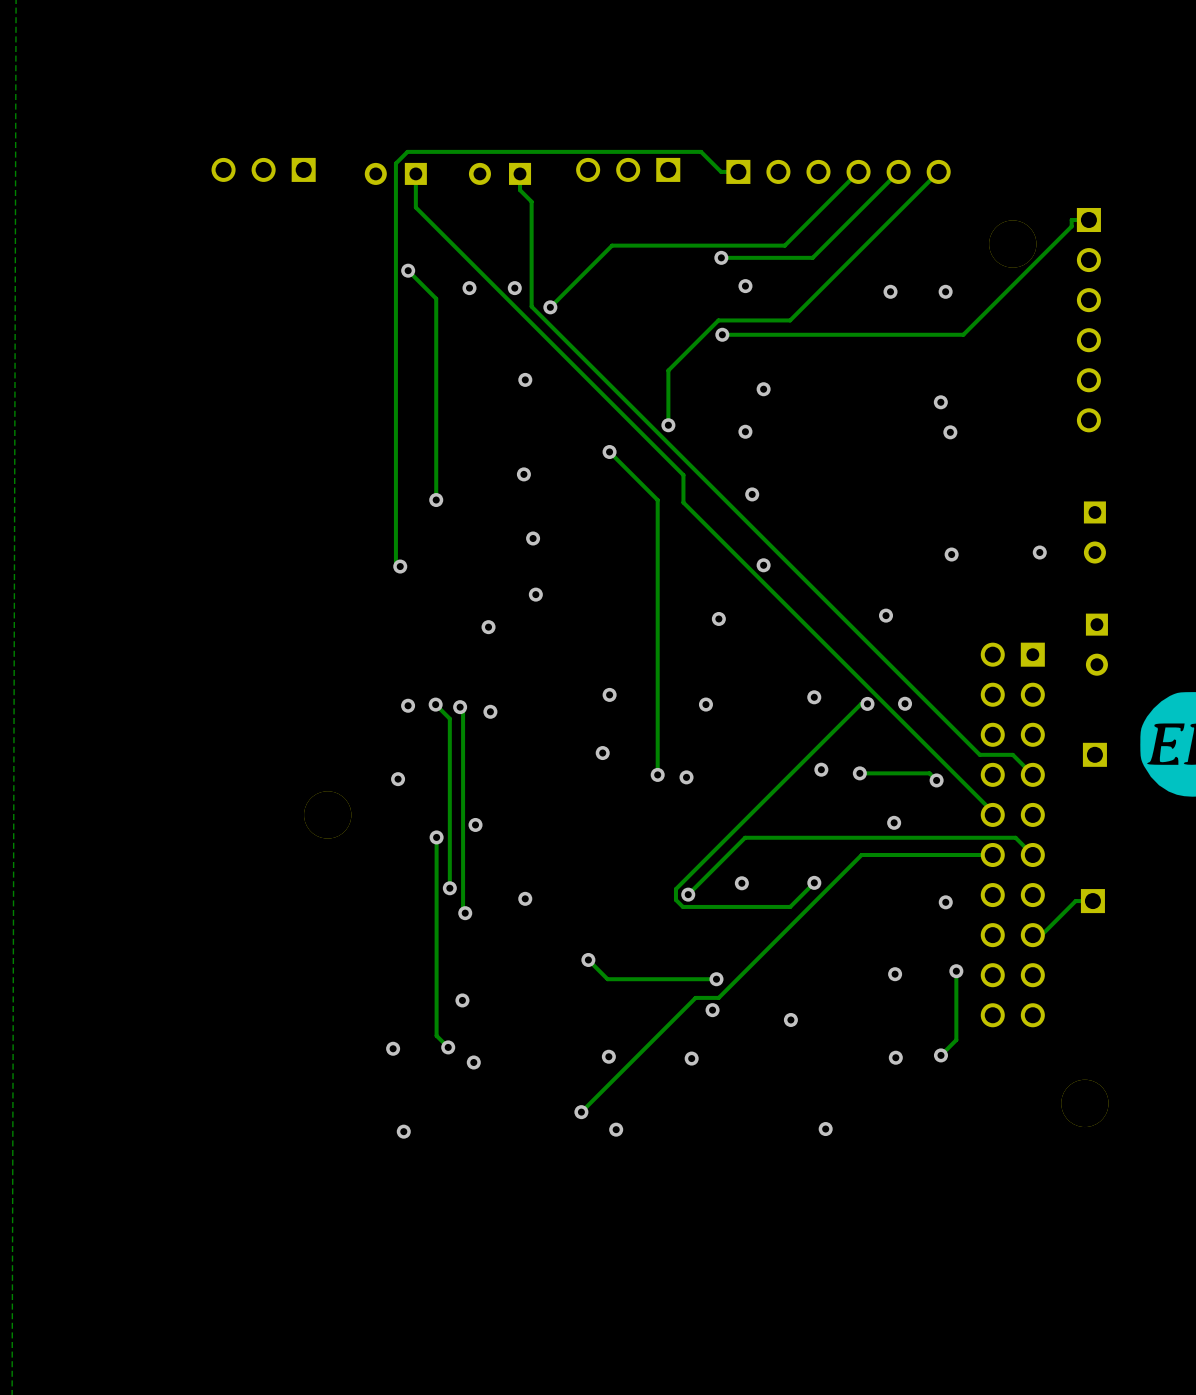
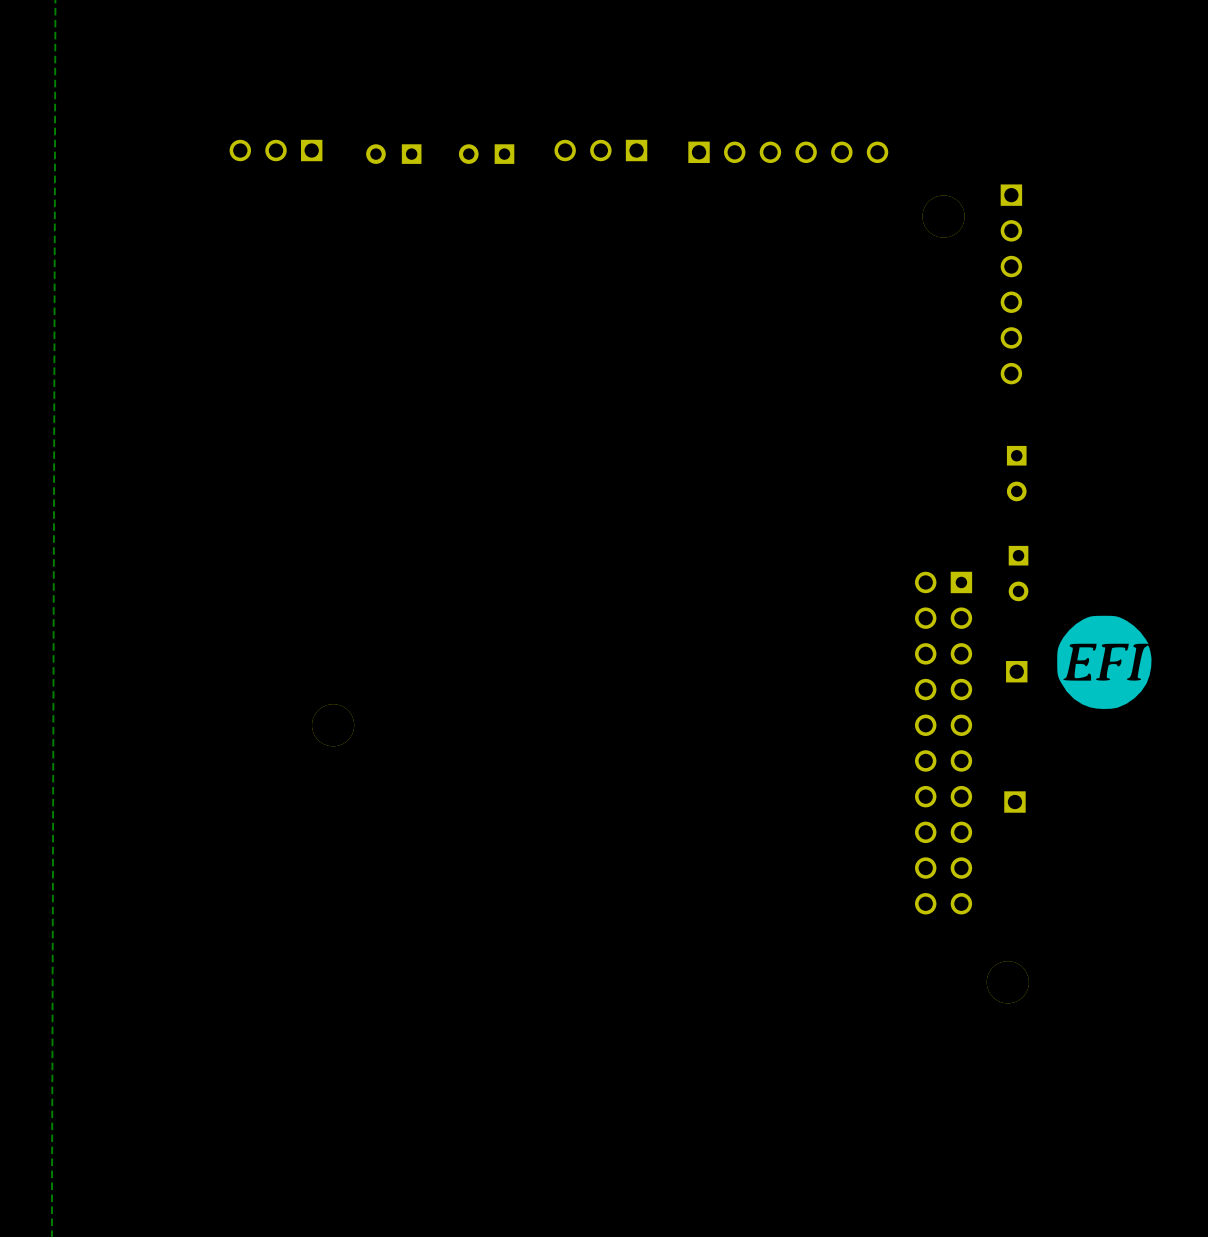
track: (738, 171) (721, 171) (701, 151) (407, 151) (395, 163) (395, 562) (400, 566) -> none
track: (858, 171) (784, 245) (612, 245) (550, 307) -> none
track: (898, 171) (812, 257) (721, 257) -> none
track: (938, 171) (790, 320) (718, 320) (668, 370) (668, 425) -> none
track: (415, 173) (415, 207) (683, 475) (683, 502) (992, 811) (992, 814) -> none
track: (520, 173) (520, 190) (531, 201) (531, 306) (979, 754) (1012, 754) (1032, 774) -> none
track: (1088, 219) (1071, 219) (1071, 226) (963, 334) (722, 334) -> none
via: (721, 257) -> none
track: (408, 270) (436, 298) (436, 500) -> none
via: (408, 270) -> none
via: (745, 286) -> none
via: (469, 288) -> none
via: (514, 288) -> none
via: (890, 291) -> none
via: (945, 291) -> none
via: (550, 307) -> none
via: (722, 334) -> none
via: (525, 379) -> none
via: (763, 389) -> none
via: (940, 402) -> none
via: (668, 425) -> none
via: (745, 431) -> none
via: (950, 432) -> none
track: (609, 452) (657, 500) (657, 774) -> none
via: (609, 452) -> none
via: (523, 474) -> none
via: (752, 494) -> none
via: (436, 500) -> none
via: (533, 538) -> none
via: (1039, 552) -> none
via: (951, 554) -> none
via: (763, 565) -> none
via: (400, 566) -> none
via: (535, 594) -> none
via: (886, 615) -> none
via: (718, 618) -> none
via: (488, 627) -> none
via: (609, 694) -> none
via: (814, 697) -> none
track: (867, 703) (861, 703) (675, 889) (675, 899) (682, 906) (790, 906) (814, 882) -> none
via: (867, 703) -> none
via: (905, 703) -> none
track: (435, 704) (449, 718) (449, 888) -> none
via: (435, 704) -> none
via: (705, 704) -> none
via: (408, 705) -> none
track: (460, 707) (463, 710) (463, 910) (465, 913) -> none
via: (460, 707) -> none
via: (490, 711) -> none
via: (602, 753) -> none
via: (821, 769) -> none
track: (859, 773) (929, 773) (936, 780) -> none
via: (859, 773) -> none
via: (657, 774) -> none
via: (686, 777) -> none
via: (398, 779) -> none
via: (936, 780) -> none
via: (894, 822) -> none
via: (475, 824) -> none
track: (436, 837) (436, 1035) (448, 1047) -> none
via: (436, 837) -> none
track: (992, 854) (861, 854) (718, 997) (695, 997) (581, 1112) -> none
track: (1032, 854) (1015, 837) (745, 837) (688, 894) -> none
via: (814, 882) -> none
via: (741, 883) -> none
via: (449, 888) -> none
via: (688, 894) -> none
via: (525, 898) -> none
track: (1092, 901) (1075, 901) (1041, 935) (1032, 935) -> none
via: (945, 902) -> none
via: (465, 913) -> none
track: (588, 959) (607, 979) (716, 979) -> none
via: (588, 959) -> none
track: (956, 971) (956, 1040) (940, 1055) -> none
via: (956, 971) -> none
via: (895, 974) -> none
via: (716, 979) -> none
via: (462, 1000) -> none
via: (712, 1010) -> none
via: (790, 1019) -> none
via: (448, 1047) -> none
via: (393, 1048) -> none
via: (940, 1055) -> none
via: (608, 1056) -> none
via: (895, 1057) -> none
via: (691, 1058) -> none
via: (473, 1062) -> none
via: (581, 1112) -> none
via: (616, 1129) -> none
via: (825, 1129) -> none
via: (403, 1131) -> none

